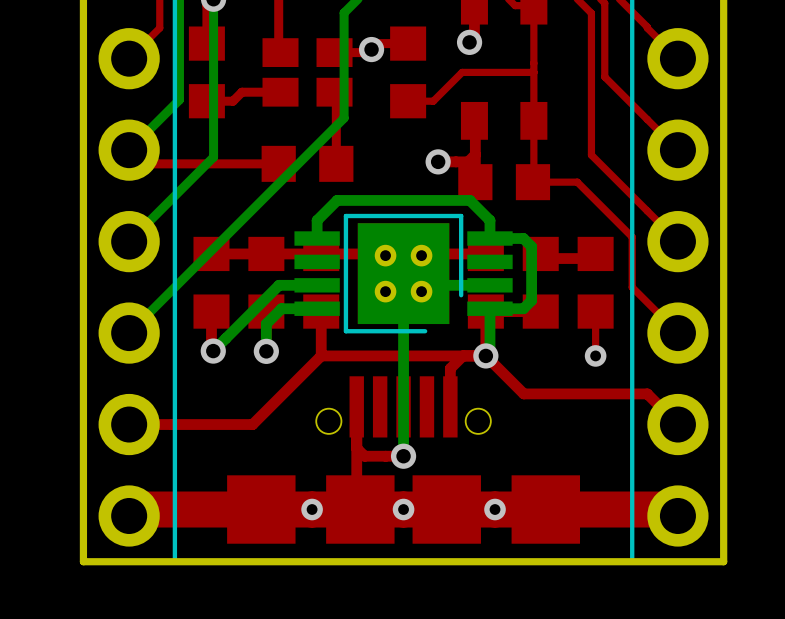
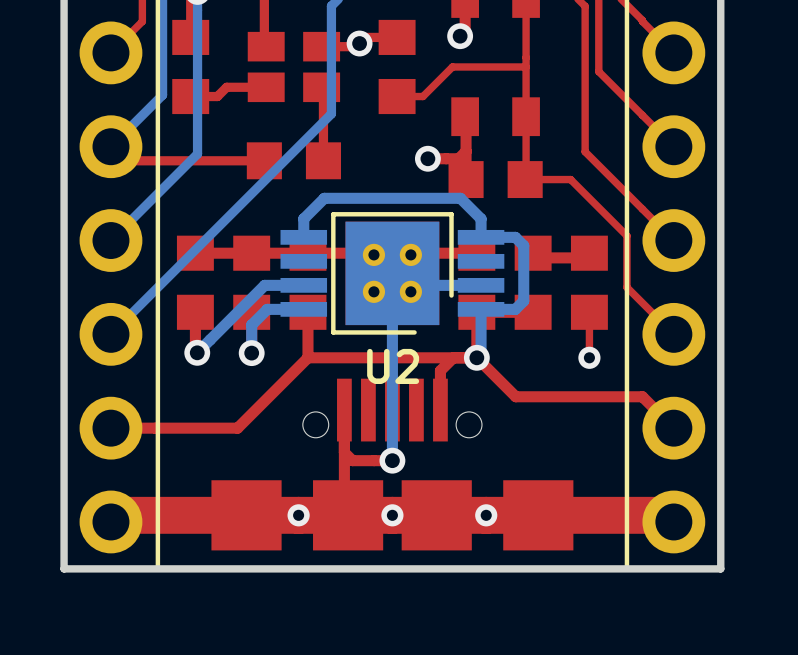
U2 name: none -> U2 (393, 366)

